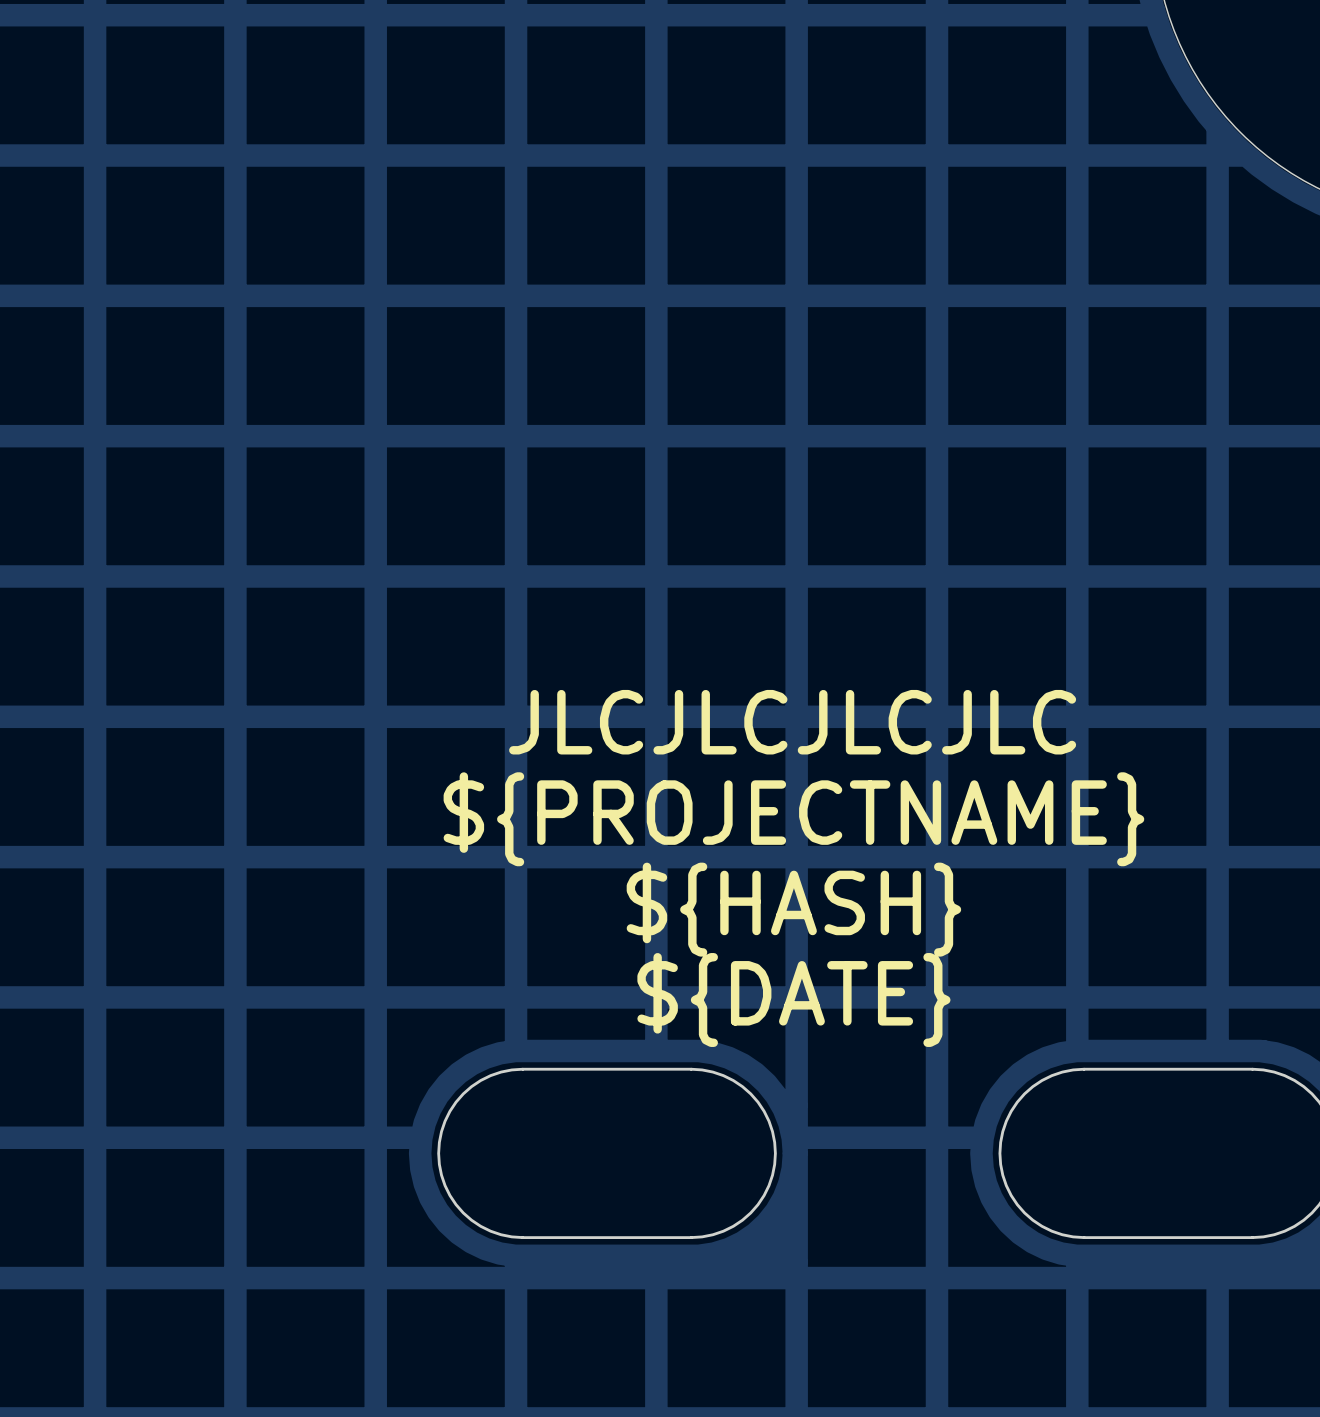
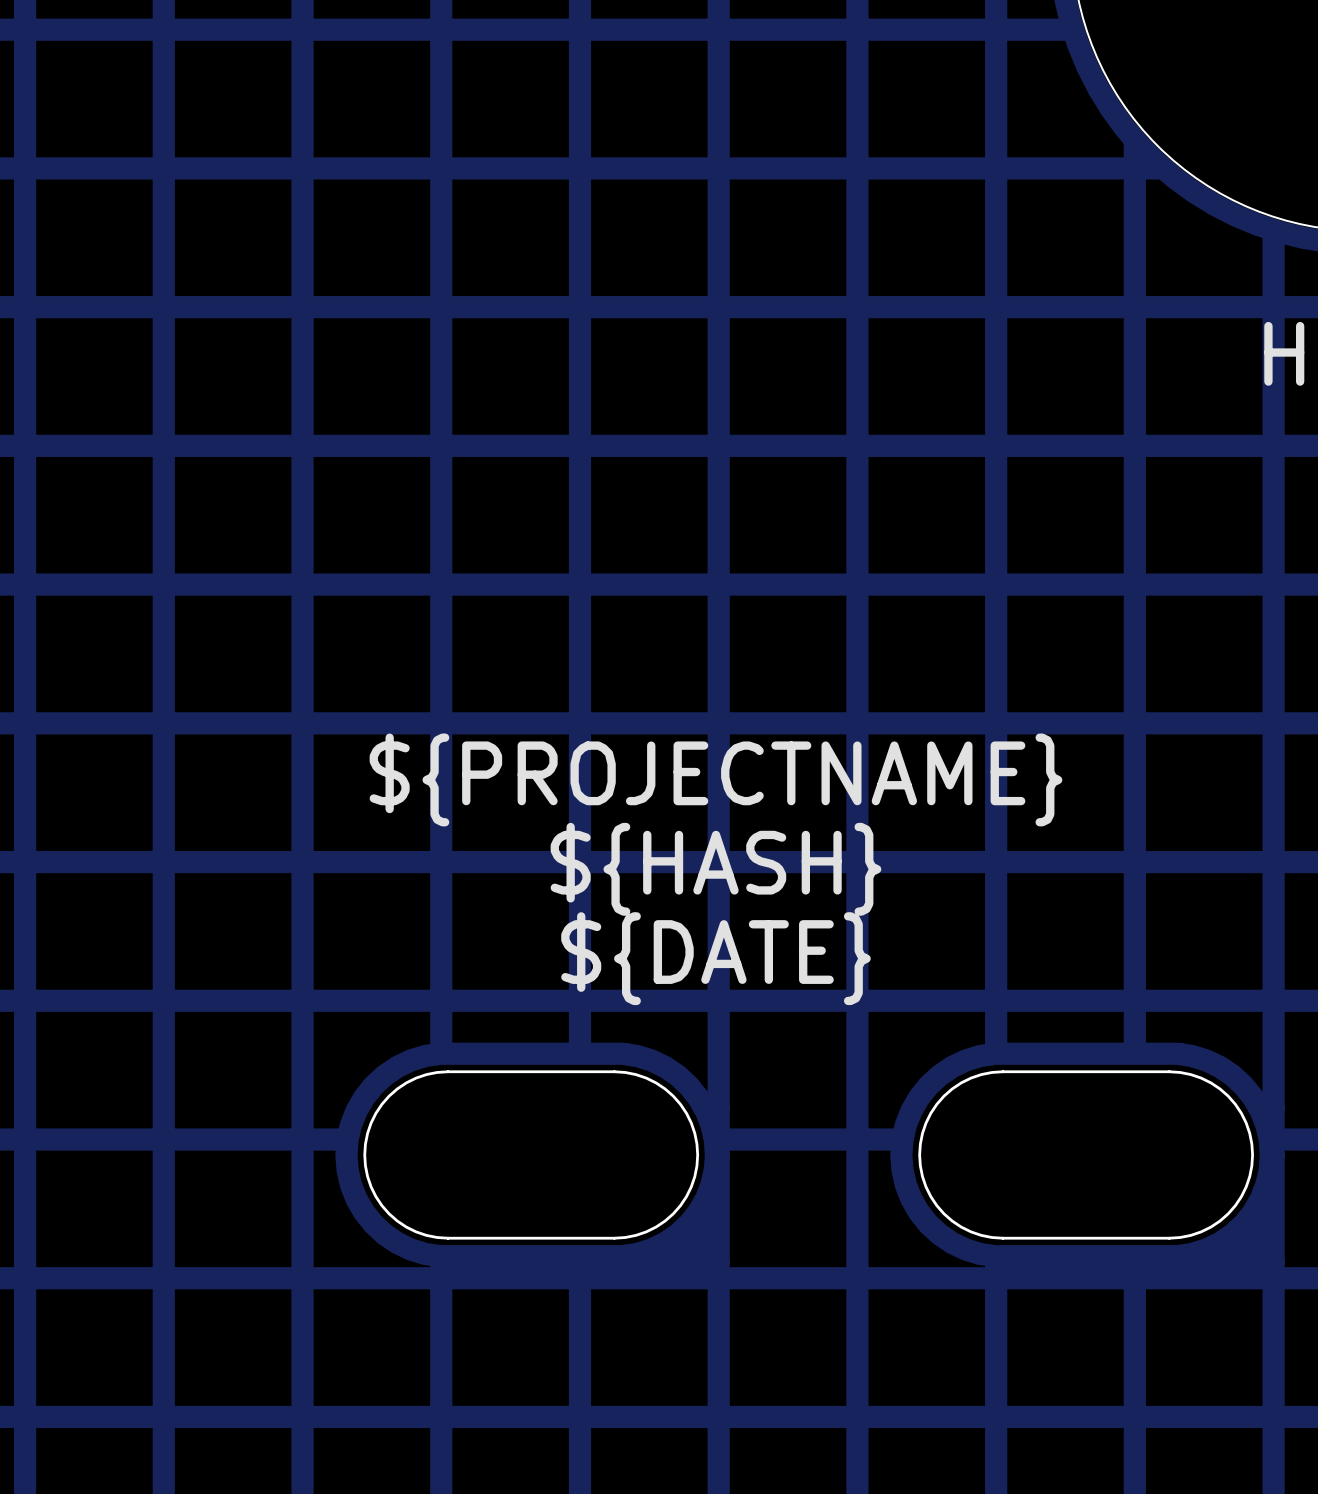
text: JLCJLCJLCJLC (792, 722) -> none
text position: ${PROJECTNAME} (793, 819) -> ${PROJECTNAME} (715, 779)
text position: ${HASH} (793, 909) -> ${HASH} (715, 869)
text position: ${DATE} (793, 999) -> ${DATE} (715, 958)

